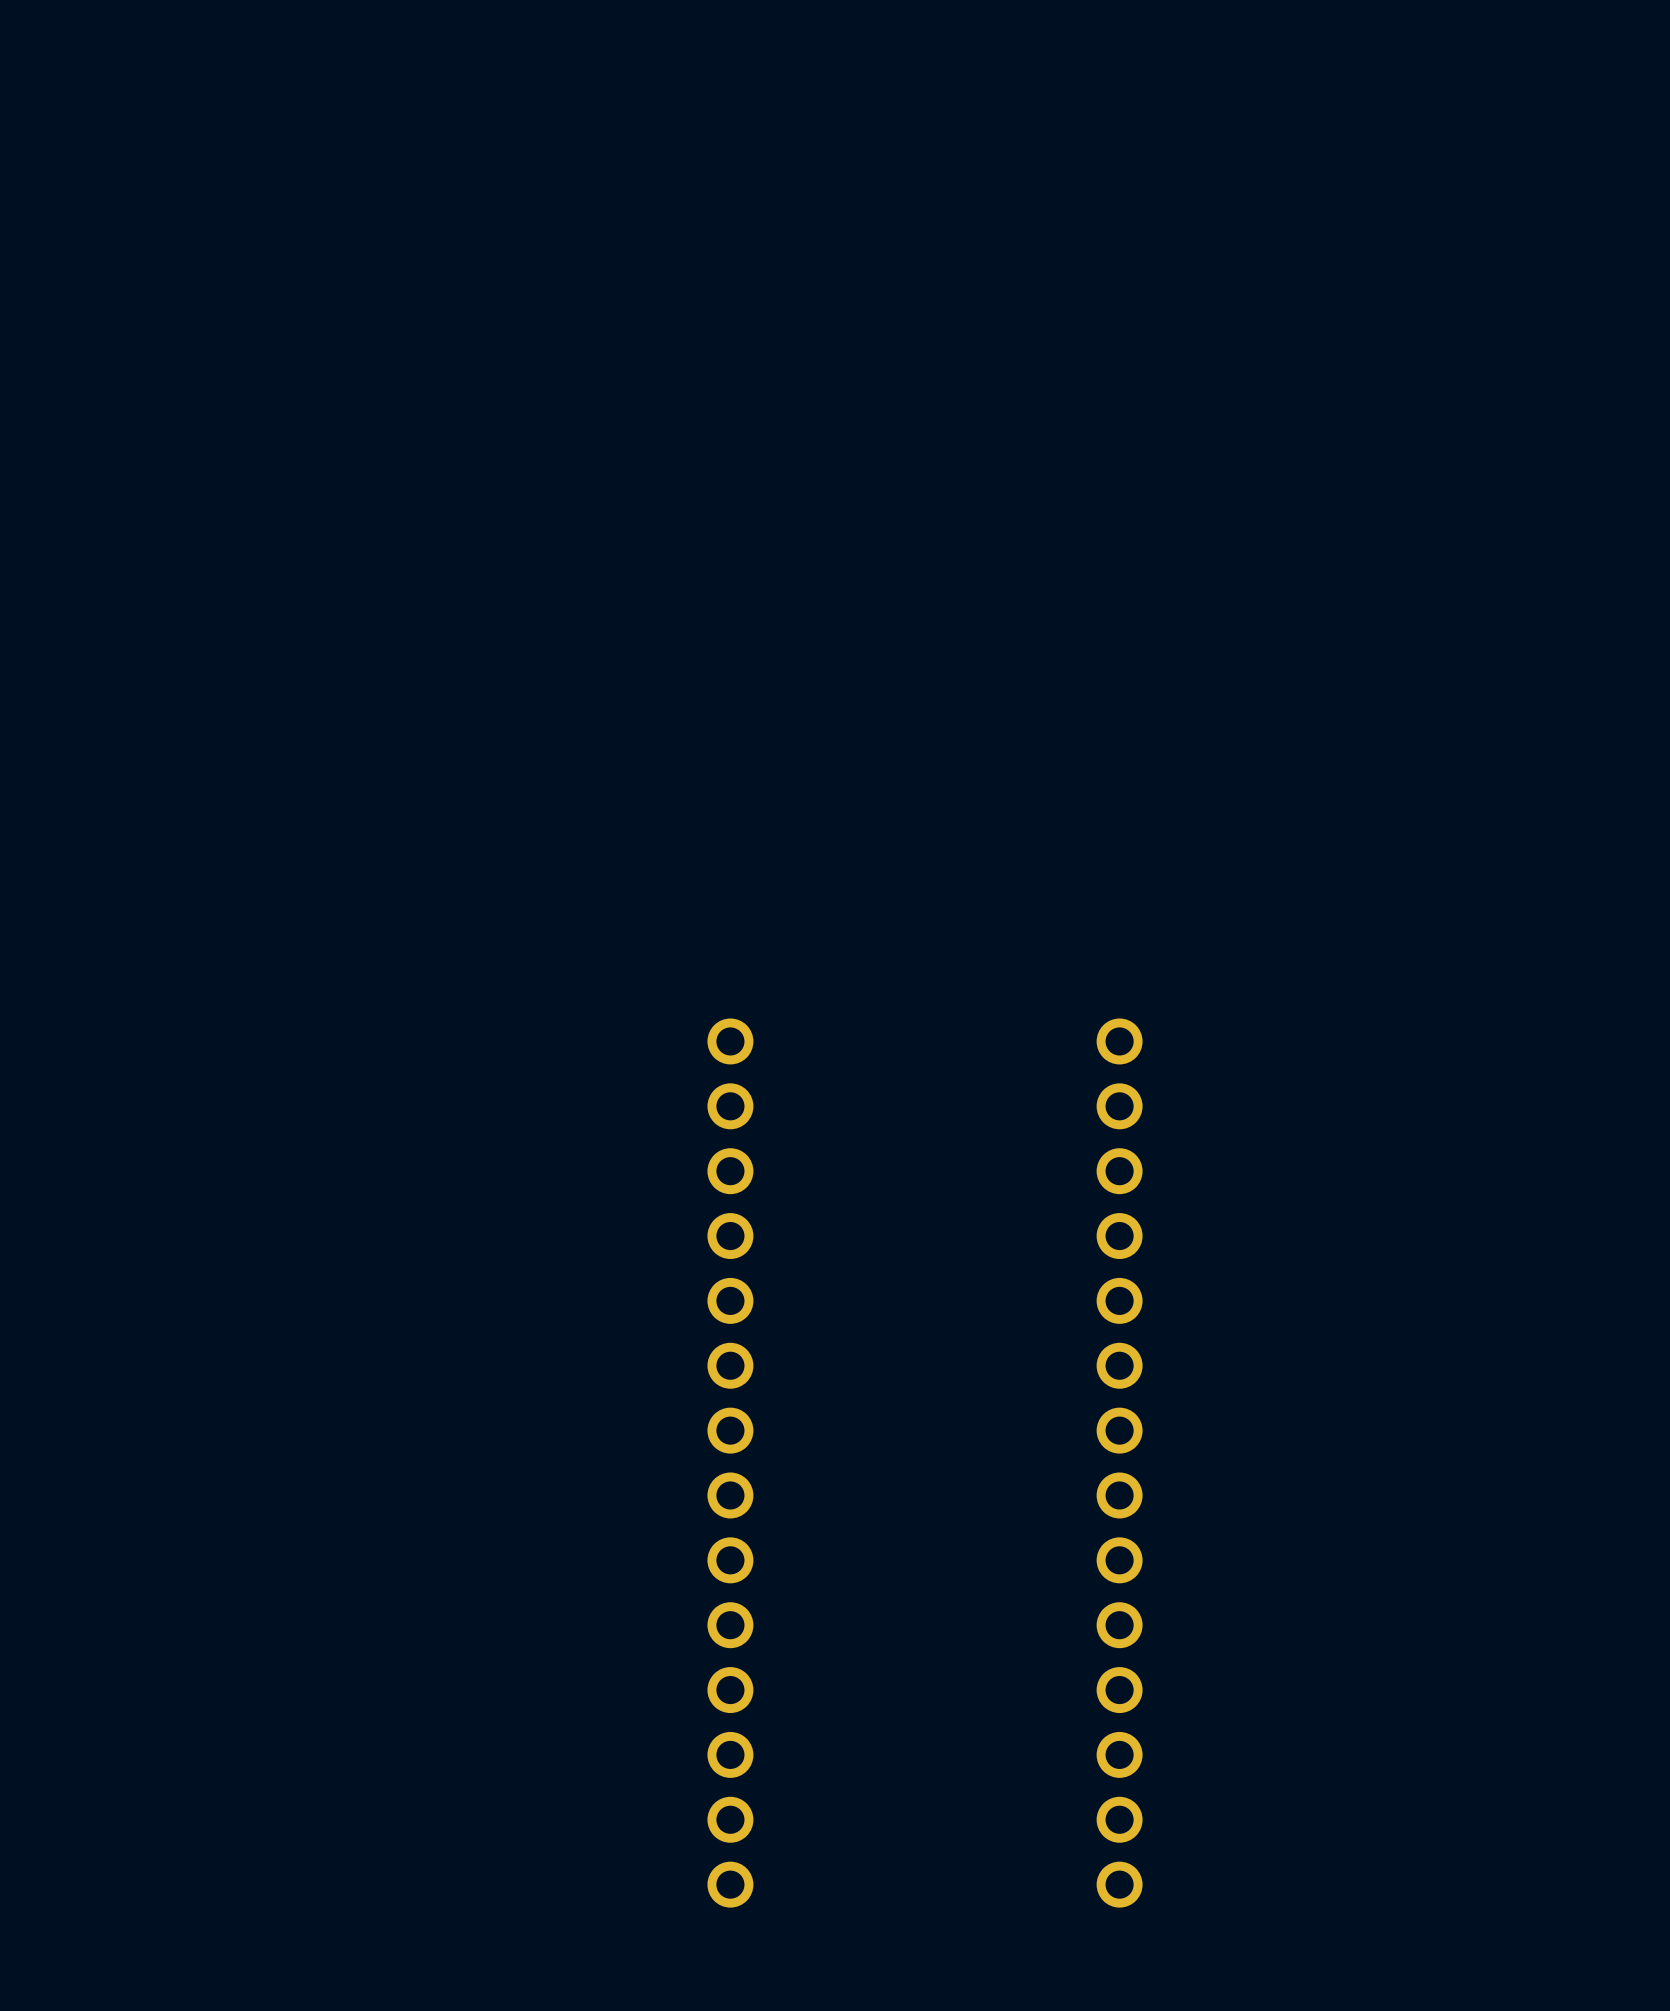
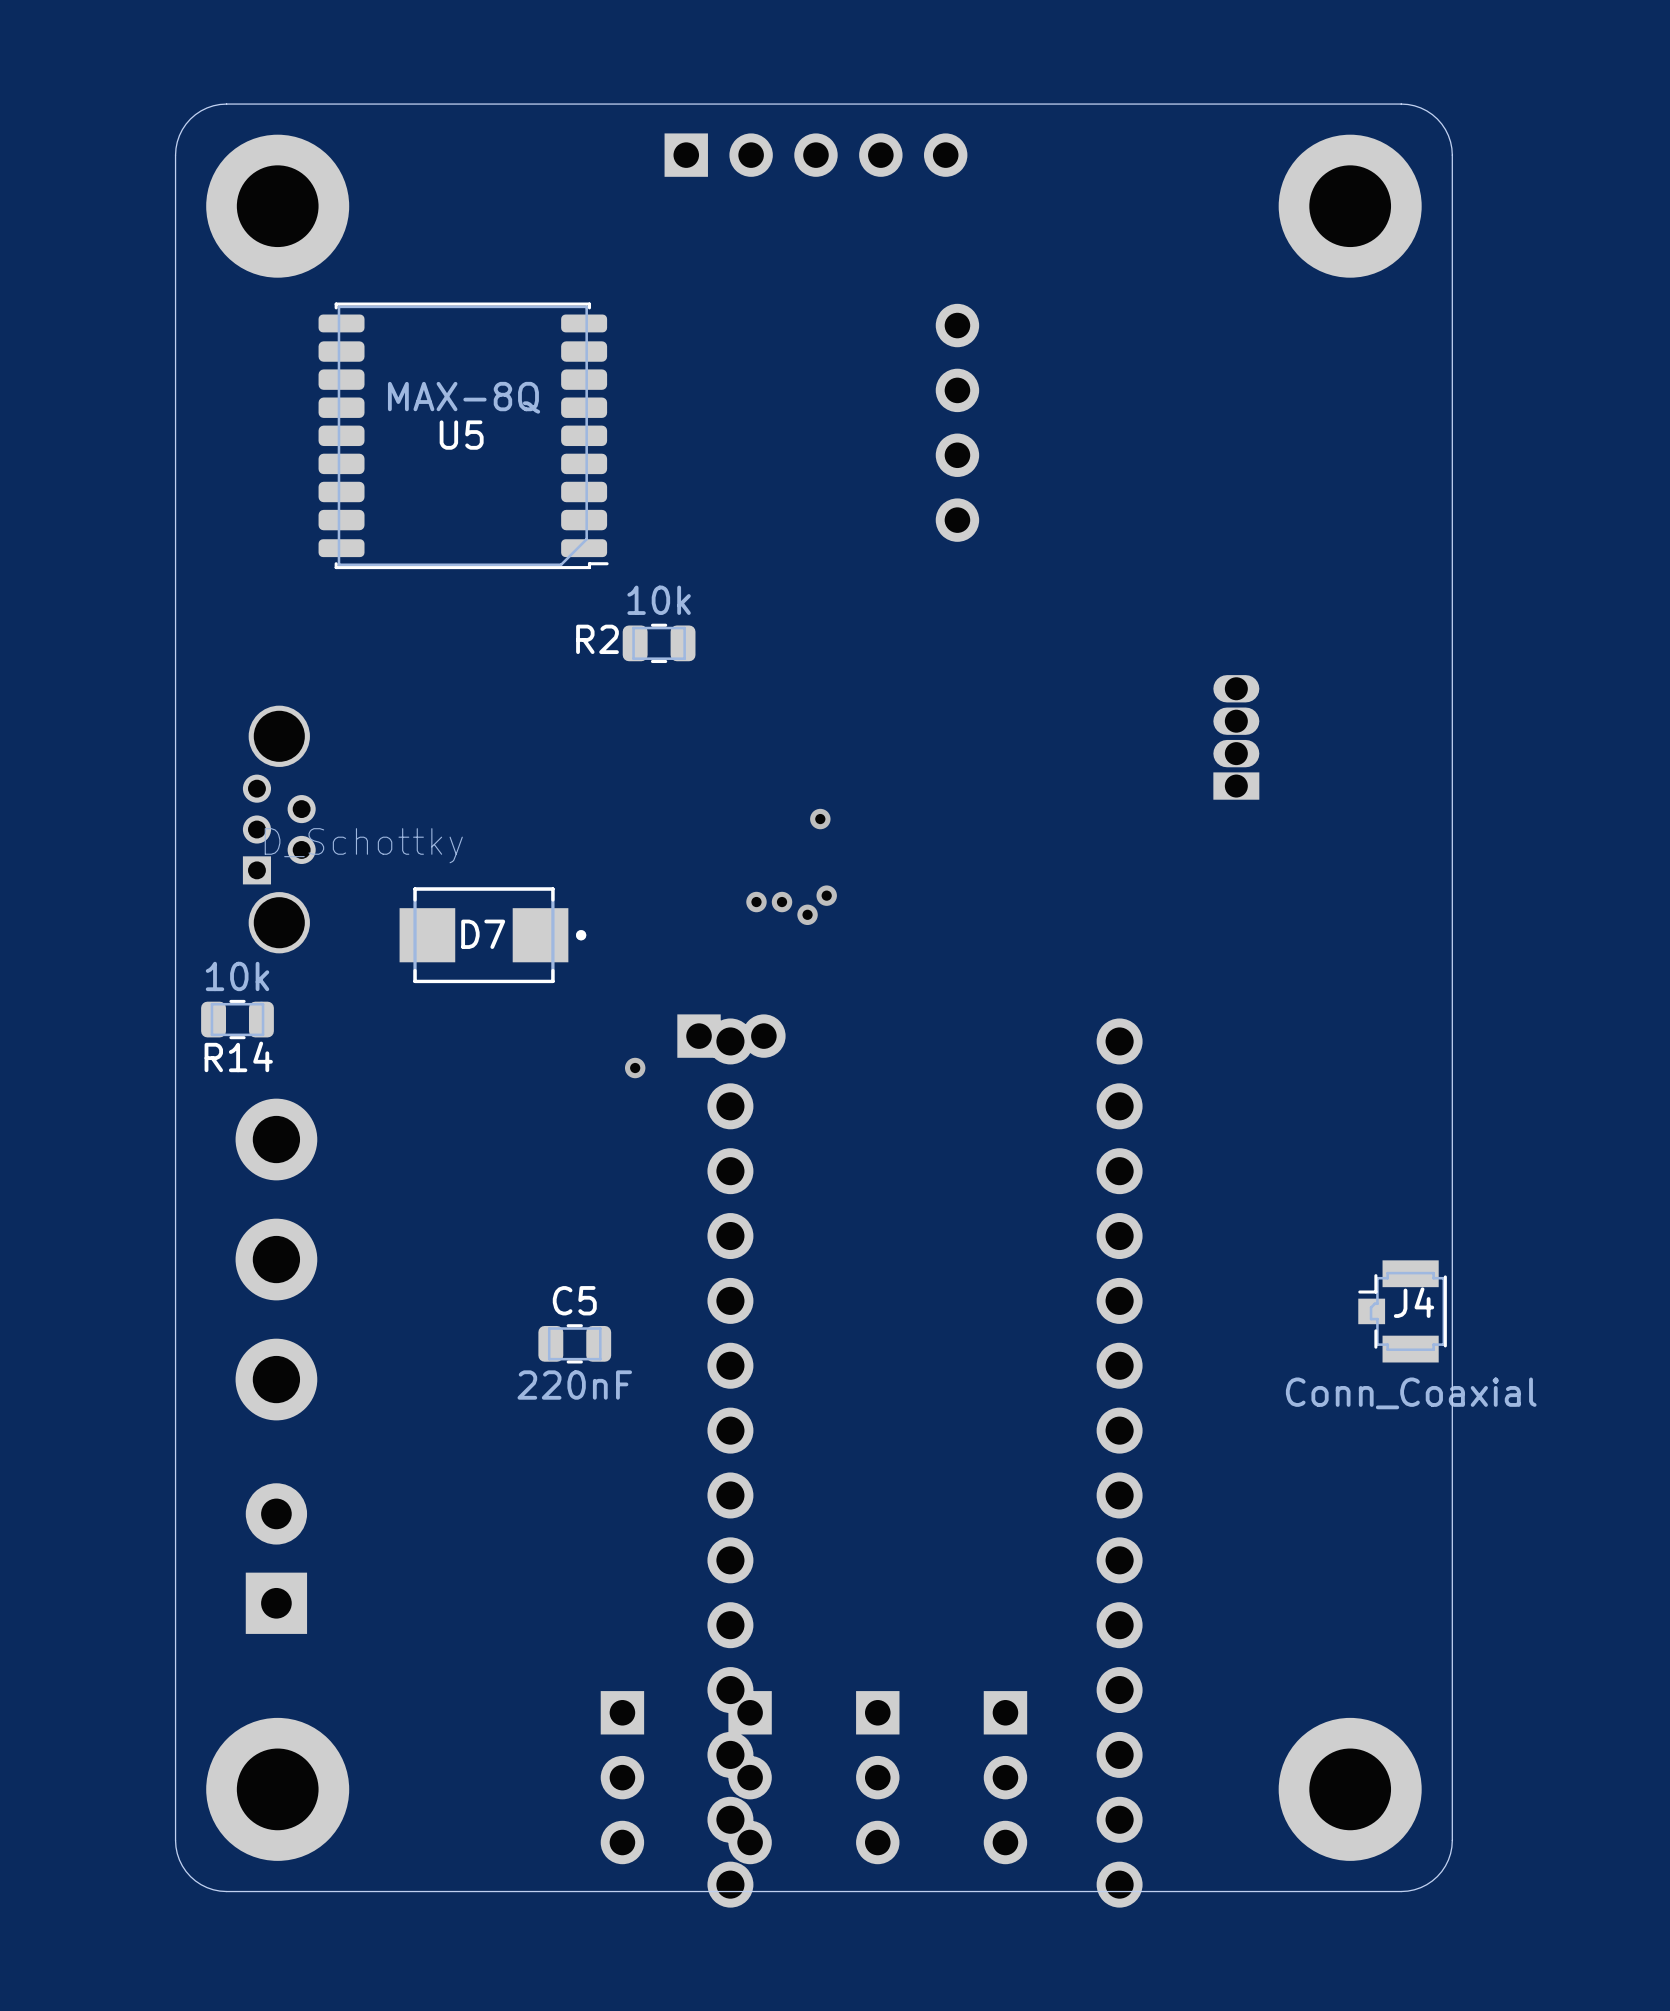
board edge: none -> (1401, 104) (226, 104) (213, 105) (201, 110) (186, 124) (179, 135) (175, 155) (175, 1840) (179, 1860) (186, 1871) (195, 1880) (213, 1889) (226, 1891) (1401, 1891) (1414, 1889) (1426, 1884) (1441, 1871) (1448, 1860) (1452, 1840) (1452, 155) (1448, 135) (1437, 119) (1420, 107) (1401, 104)
part: none -> (815, 155)
part: none -> (277, 206)
part: none -> (1350, 206)
part: none -> (957, 422)
U5: none -> MAX-8Q (463, 435)
R2: none -> 10k (659, 643)
part: none -> (1236, 737)
via: none -> (820, 819)
part: none -> (279, 829)
via: none -> (826, 895)
via: none -> (756, 902)
via: none -> (782, 902)
via: none -> (807, 914)
D7: none -> D_Schottky (492, 935)
R14: none -> 10k (237, 1019)
part: none -> (731, 1036)
via: none -> (635, 1068)
part: none -> (276, 1259)
J4: none -> Conn_Coaxial (1402, 1311)
C5: none -> 220nF (574, 1343)
part: none -> (276, 1558)
part: none -> (622, 1777)
part: none -> (750, 1777)
part: none -> (877, 1777)
part: none -> (1005, 1777)
part: none -> (277, 1789)
part: none -> (1350, 1789)

